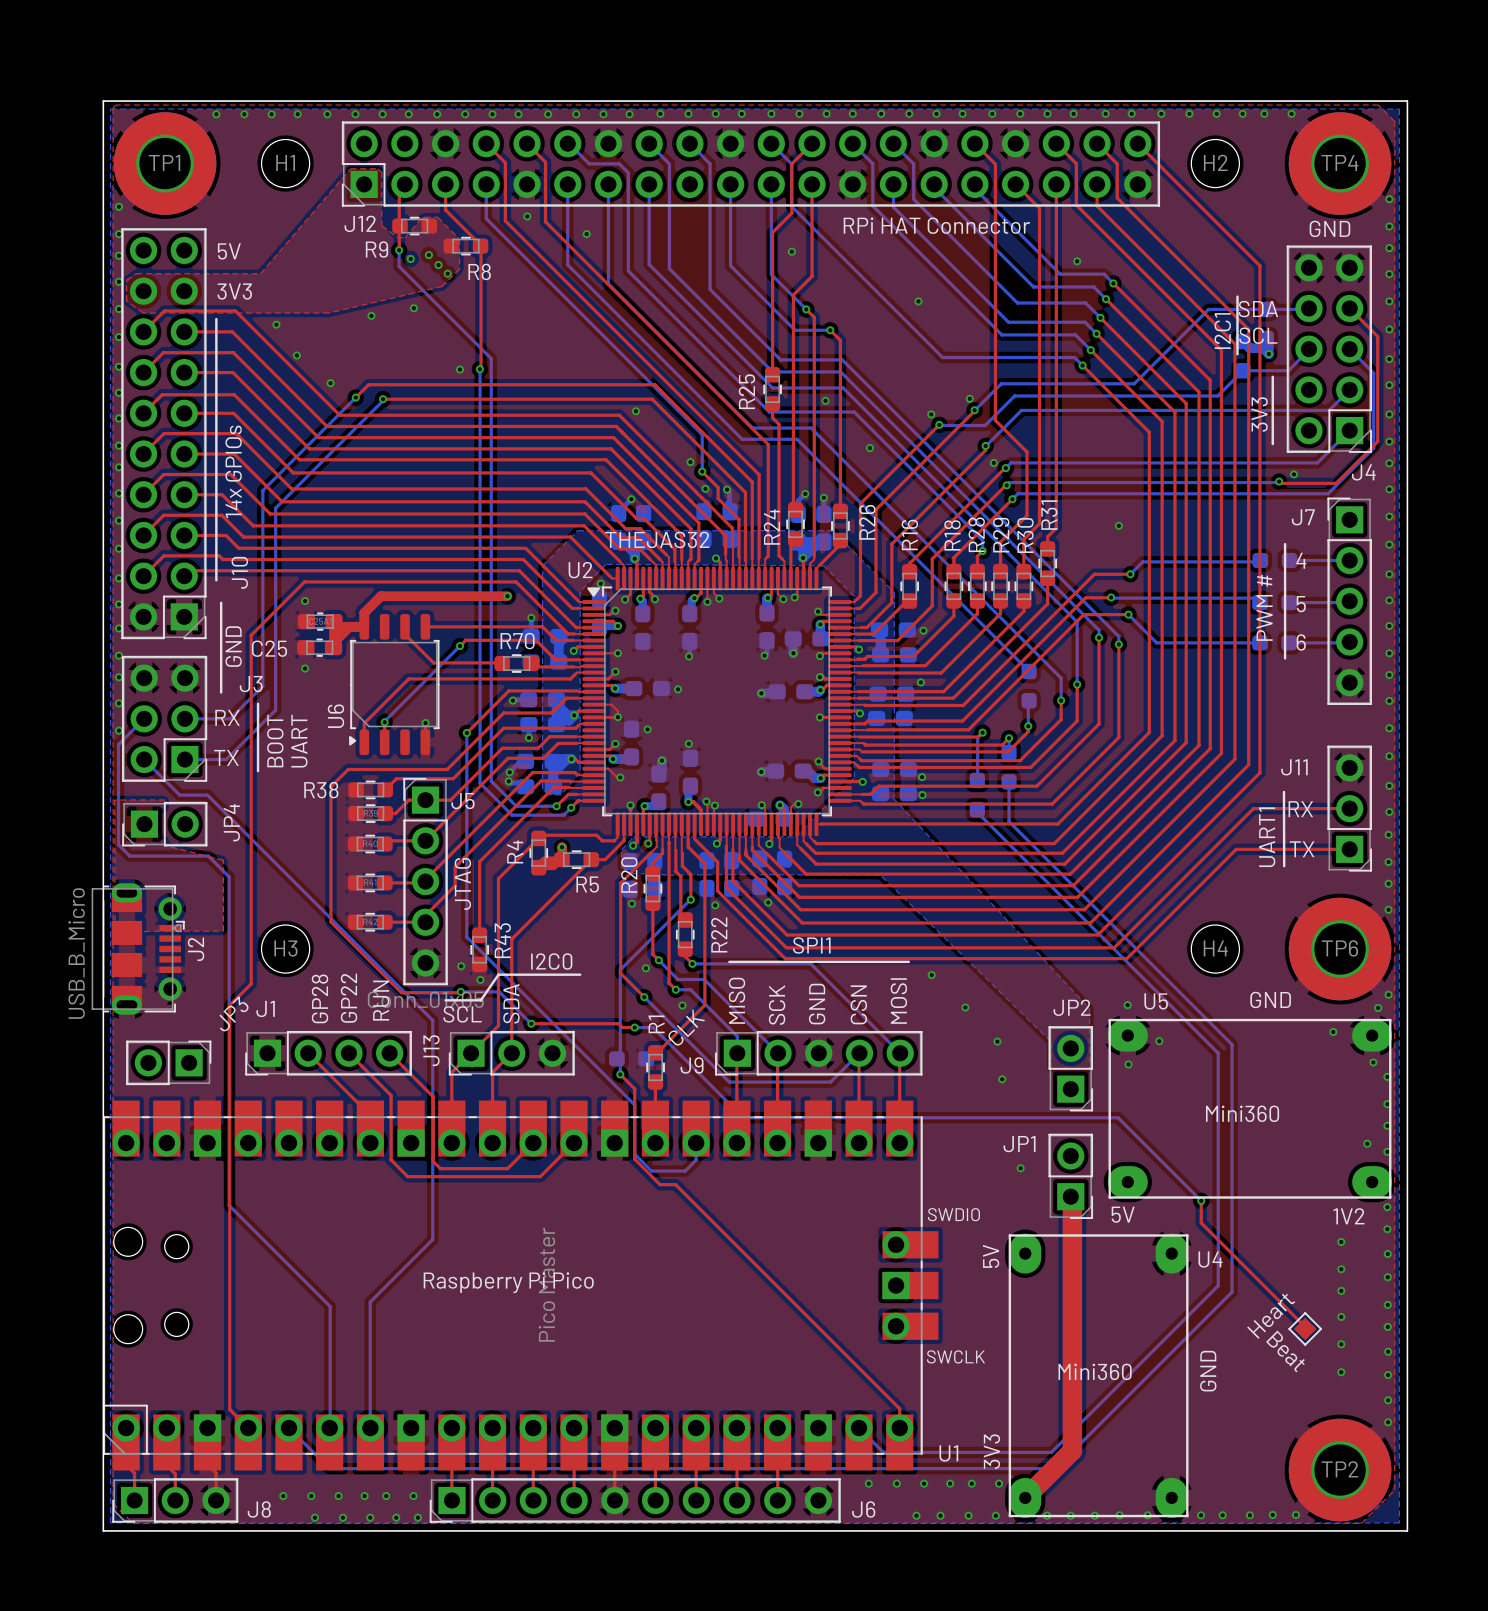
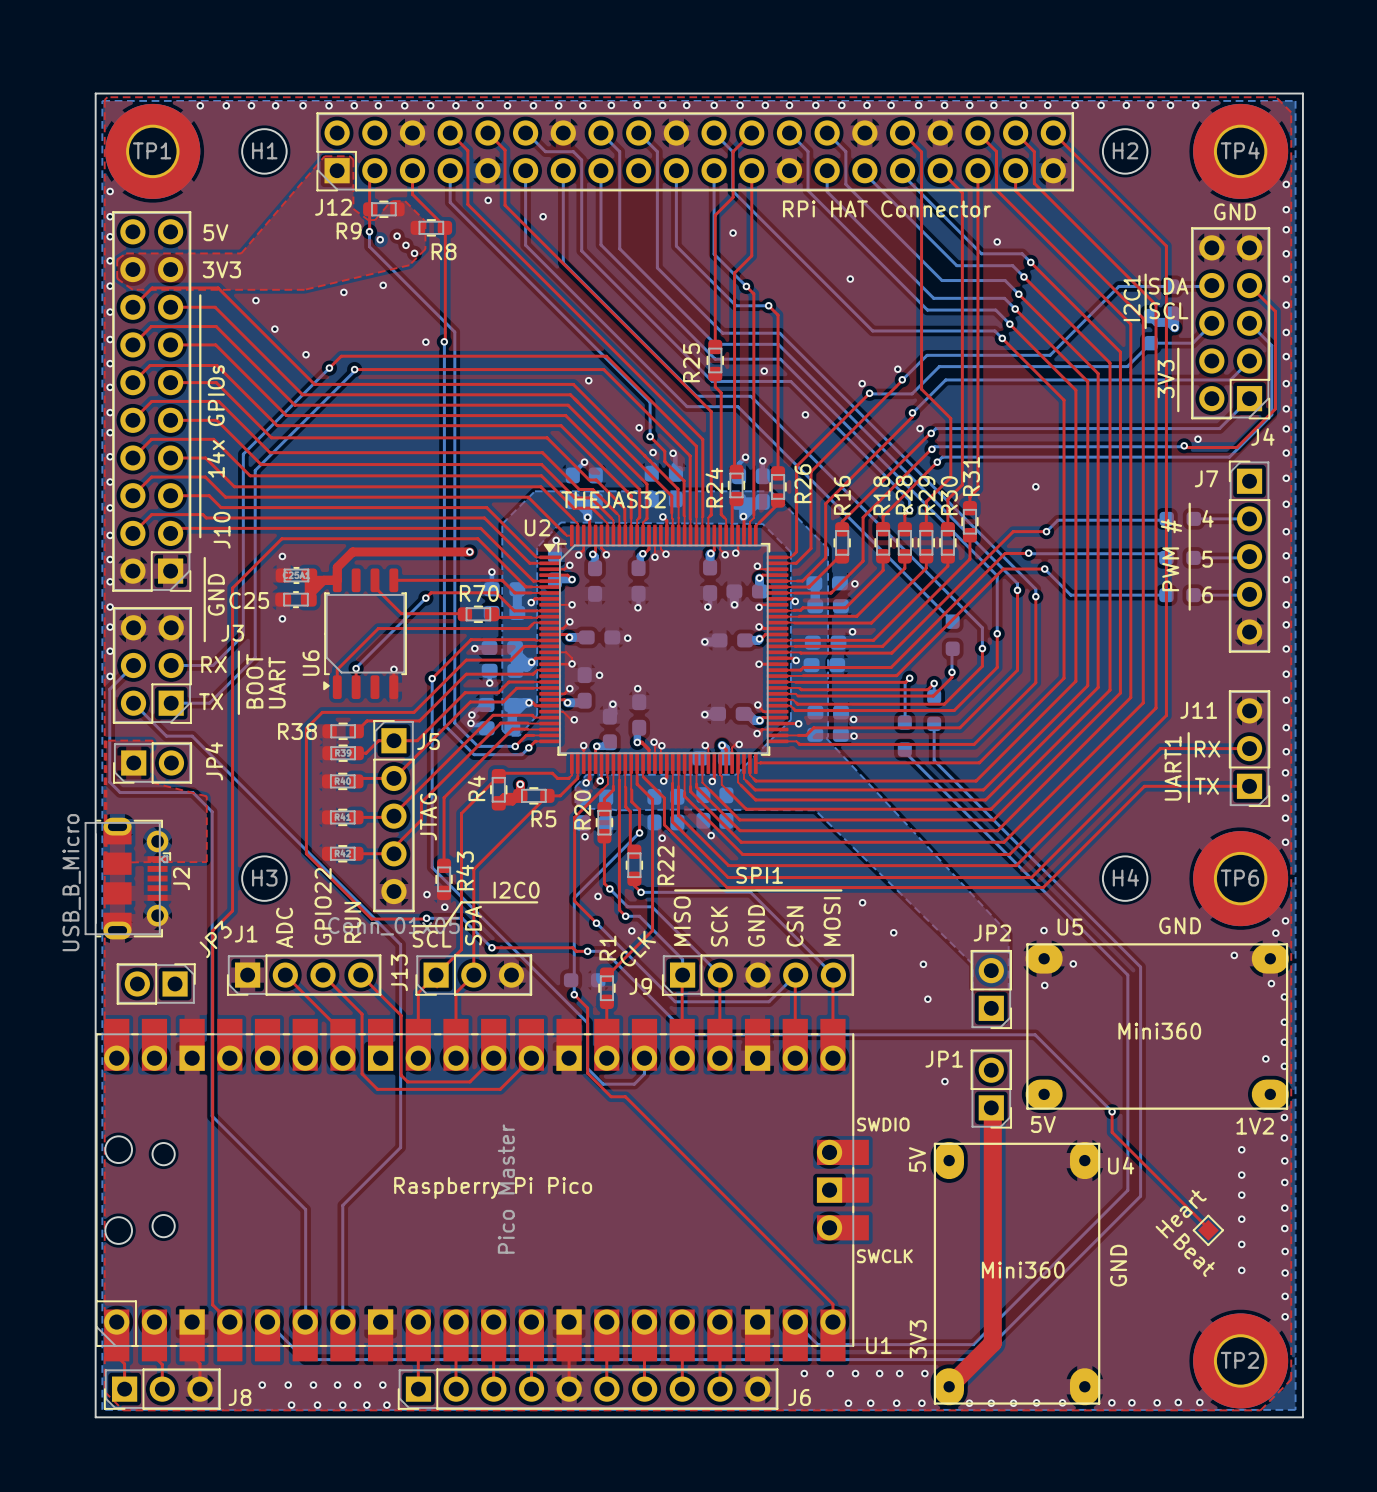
text: GP28 (319, 998) -> ADC (284, 927)
text: GP22 (349, 998) -> GPIO22 (323, 906)

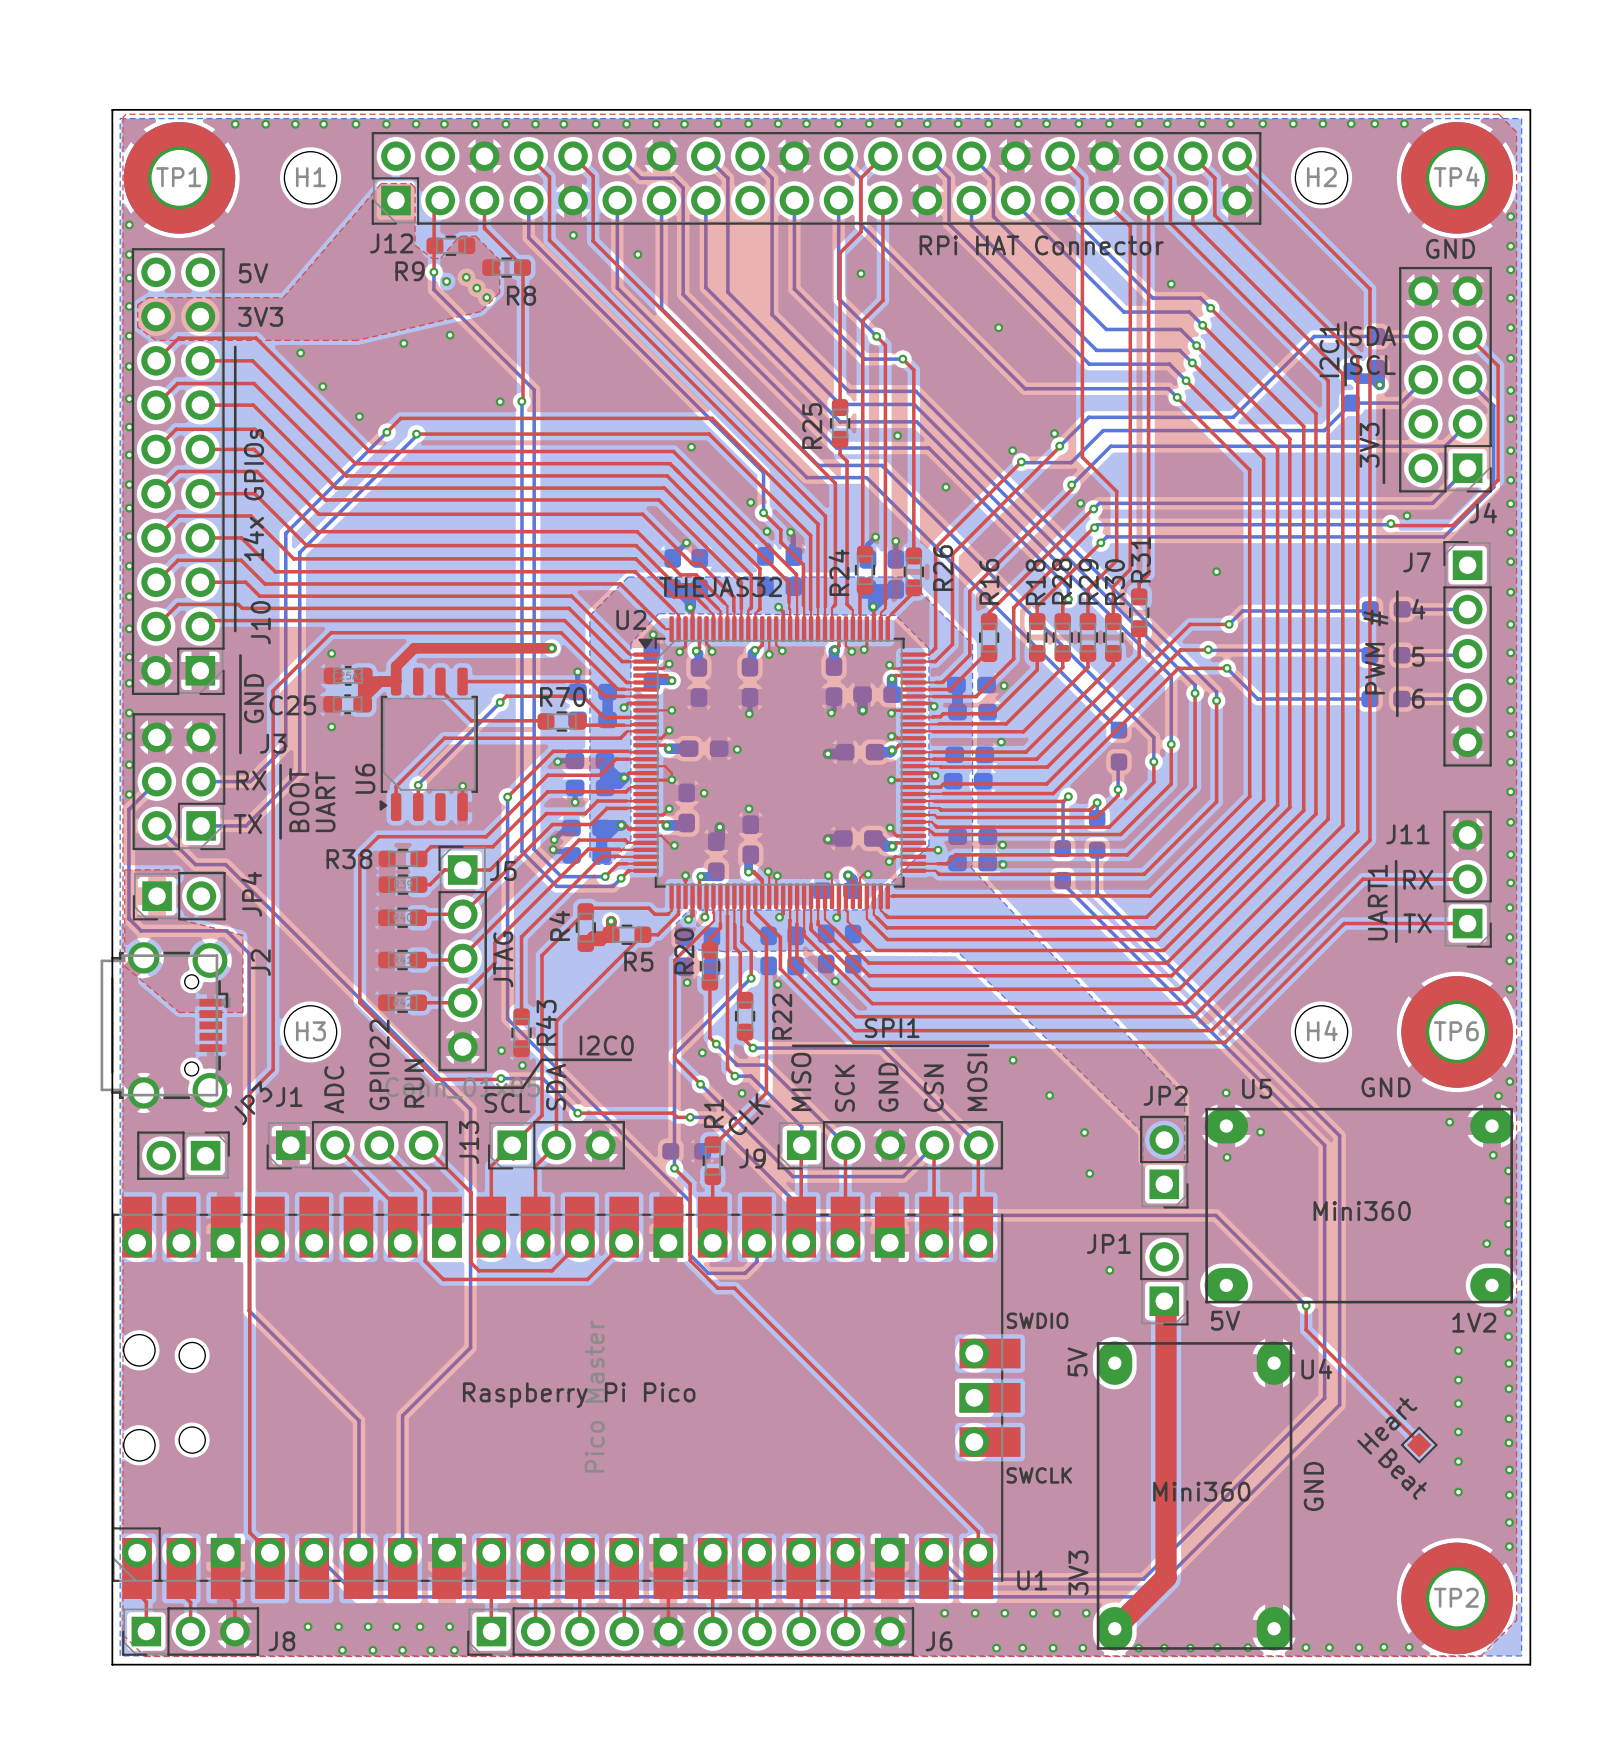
top zone outline: (106, 740) (106, 862) (152, 862) -> (124, 869) (124, 966) (179, 1012)
J2 footprint: [84, 817, 172, 940] -> [100, 942, 231, 1109]
J2 name position: J2 (181, 878) -> J2 (260, 962)
J2 value: USB_B_Micro (71, 882) -> none

